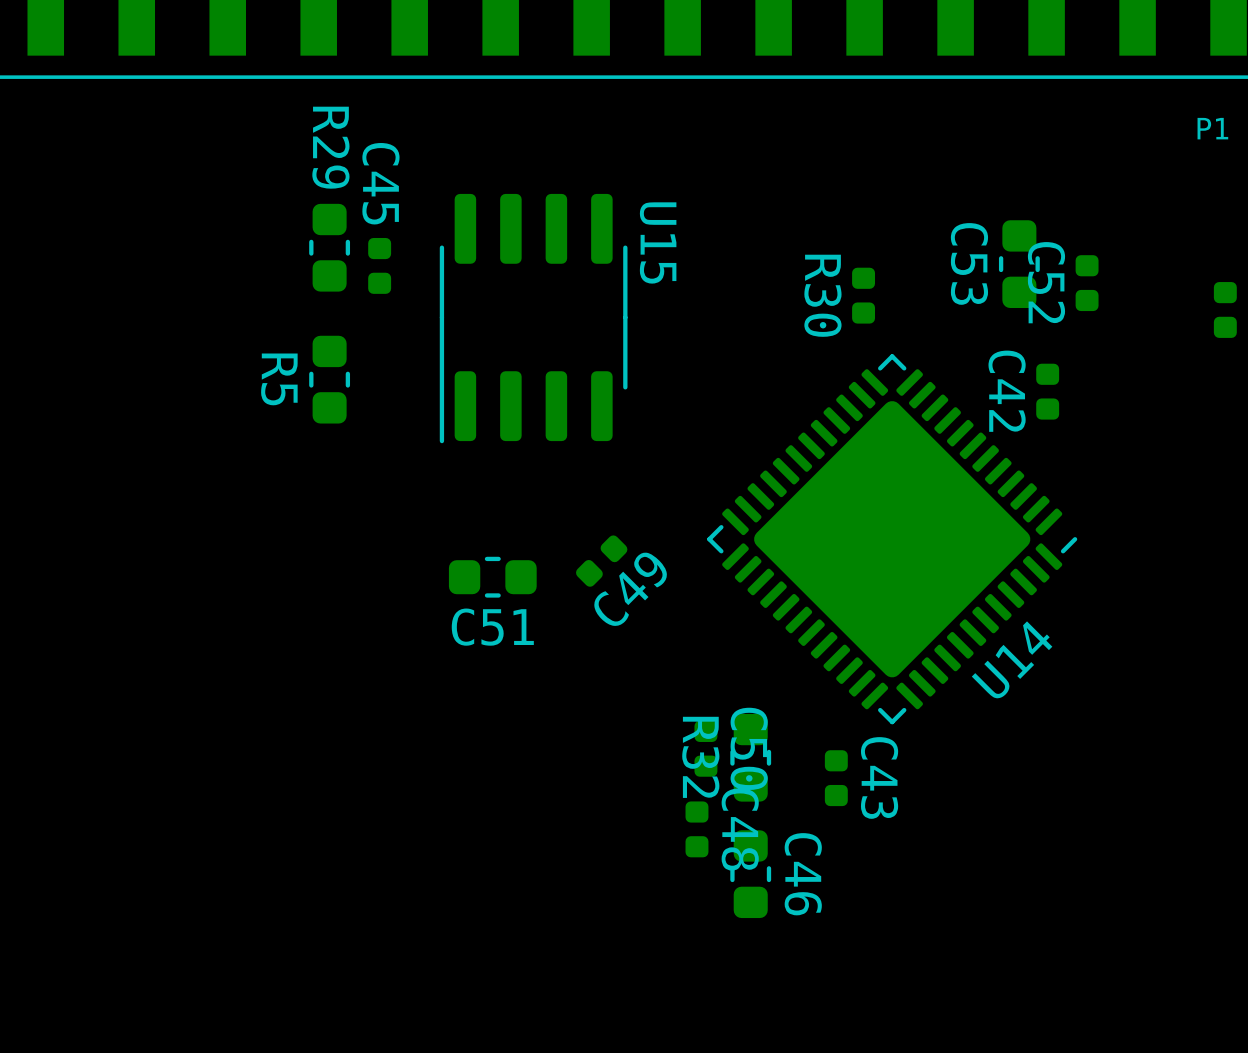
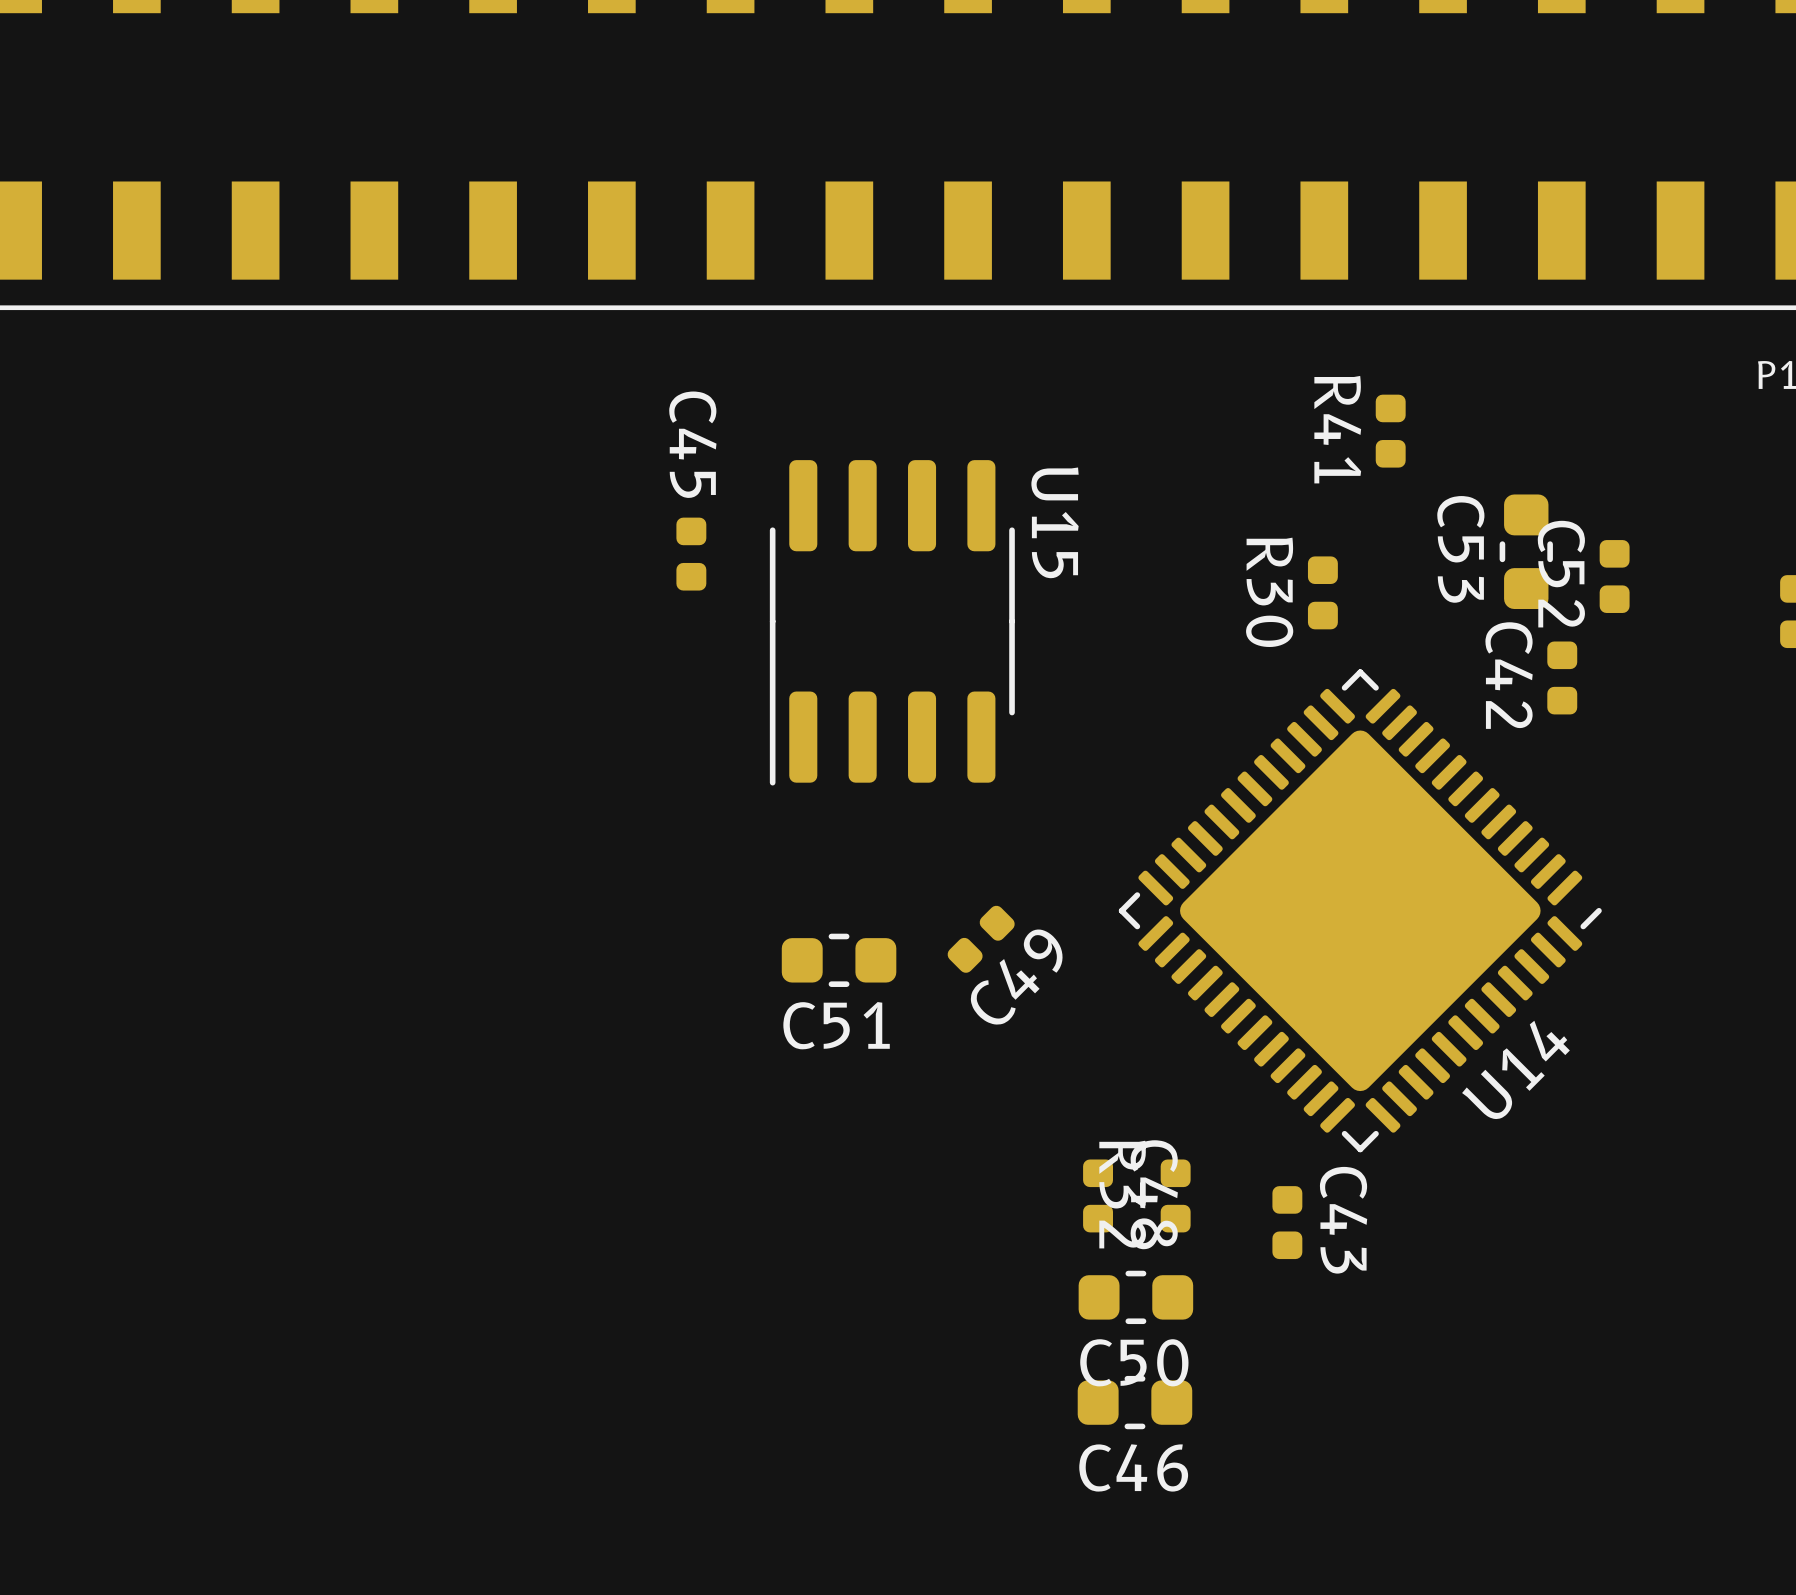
R41: none -> (1390, 431)
R29: (329, 247) -> none
R5: (329, 379) -> none
C42 position: (1047, 391) -> (1562, 677)
R32 footprint: [730, 713, 772, 802] -> [1160, 1159, 1191, 1233]
C50 footprint: [694, 720, 718, 777] -> [1078, 1270, 1194, 1325]
C48 position: (696, 829) -> (1098, 1195)
C46 rotation: 0° (750, 874) -> 90° clockwise (1134, 1402)

